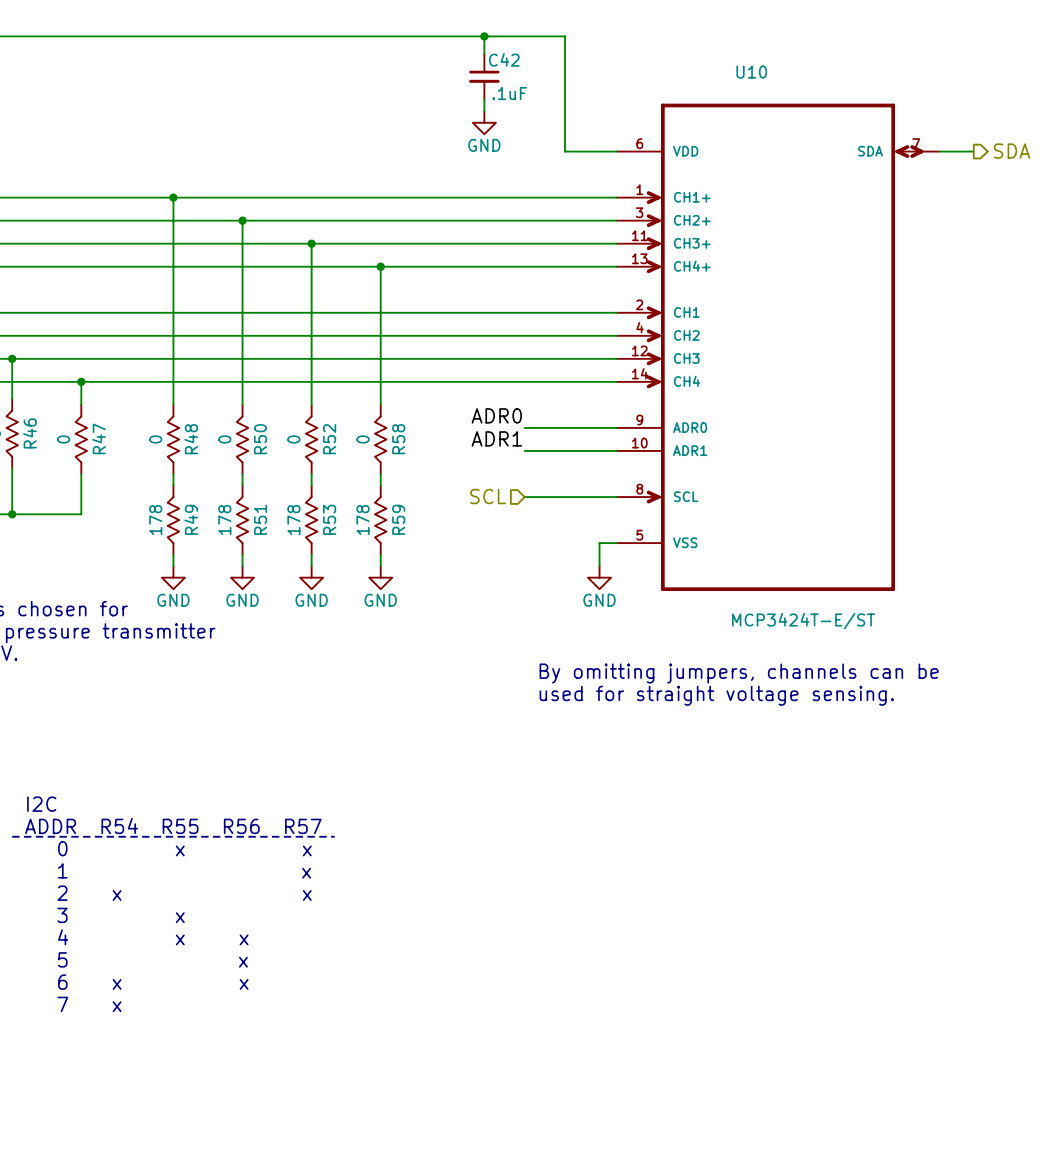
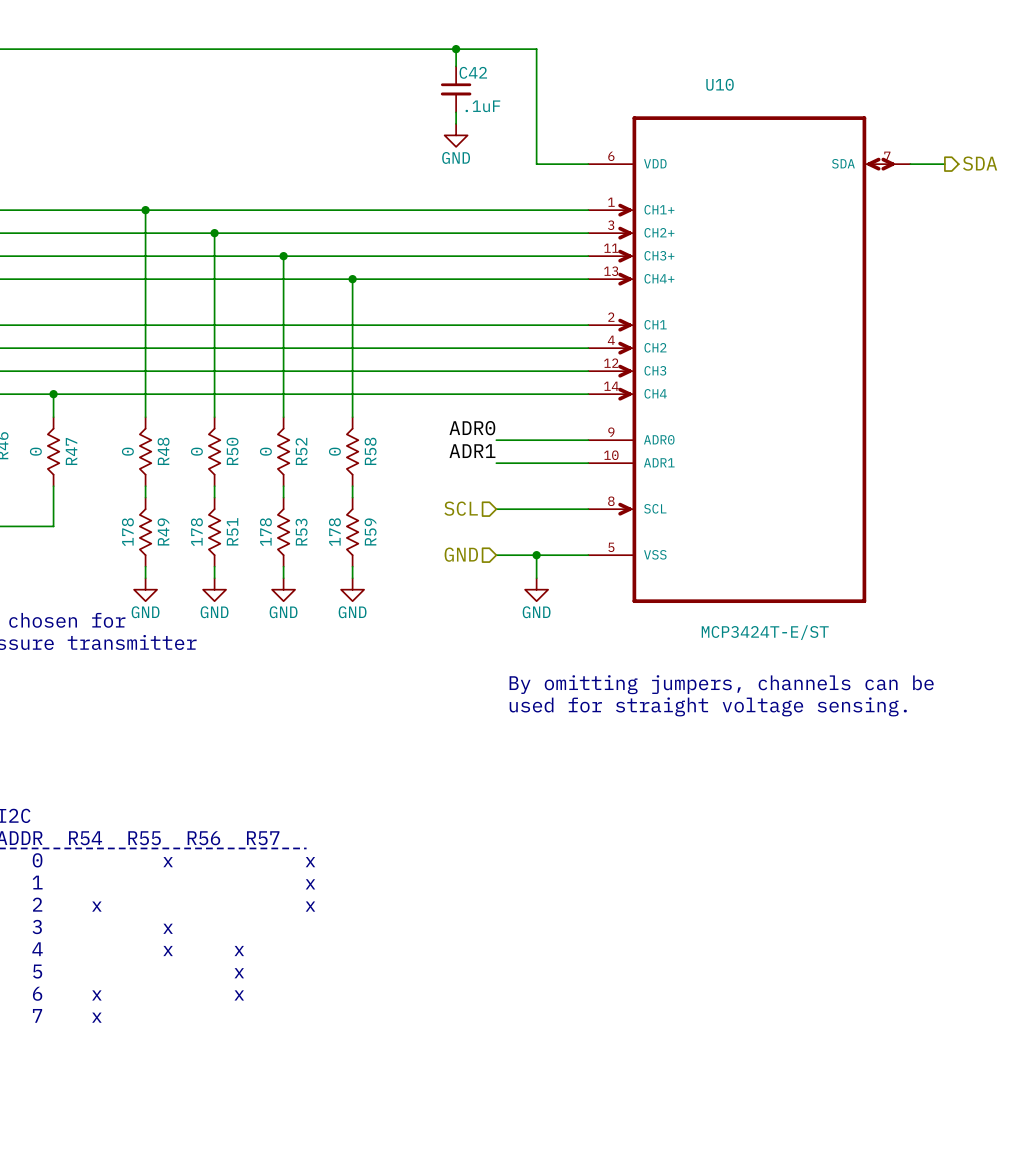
hierarchical label: none -> GND (461, 554)
wire: none -> (536, 555) (536, 578)
junction: none -> (536, 555)
wire: (599, 543) (599, 566) -> (571, 555) (496, 555)
power symbol position: GND (599, 577) -> GND (536, 589)

